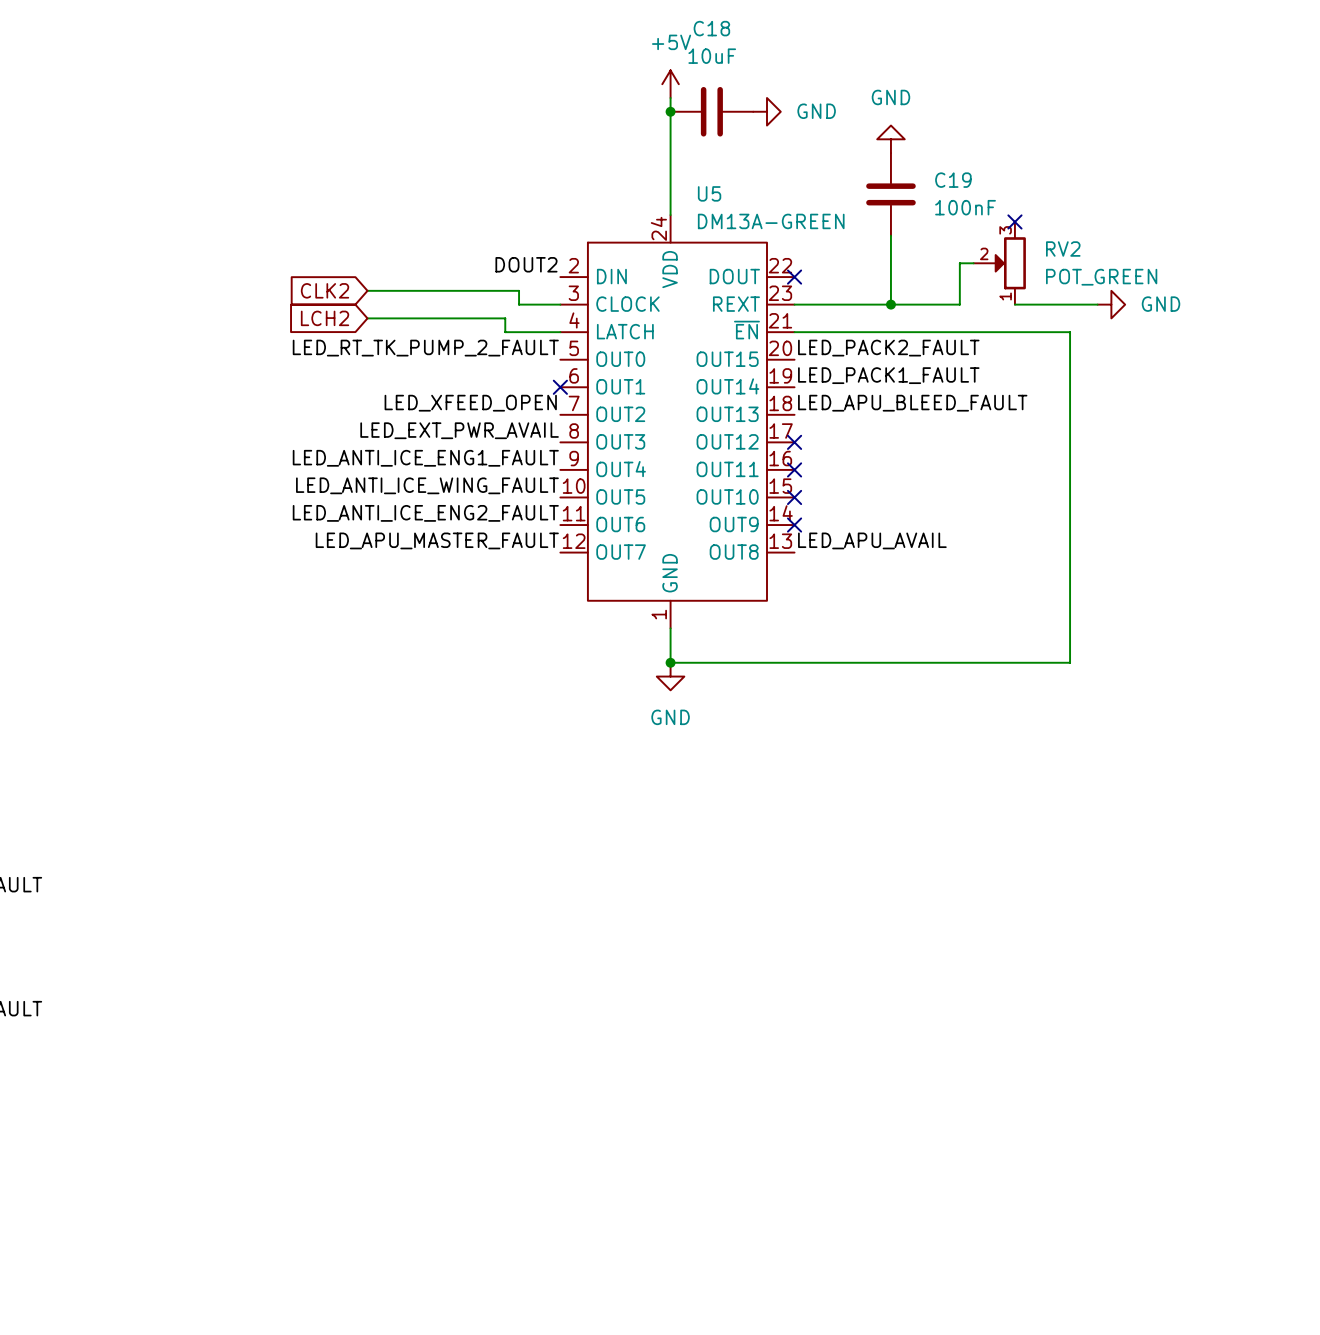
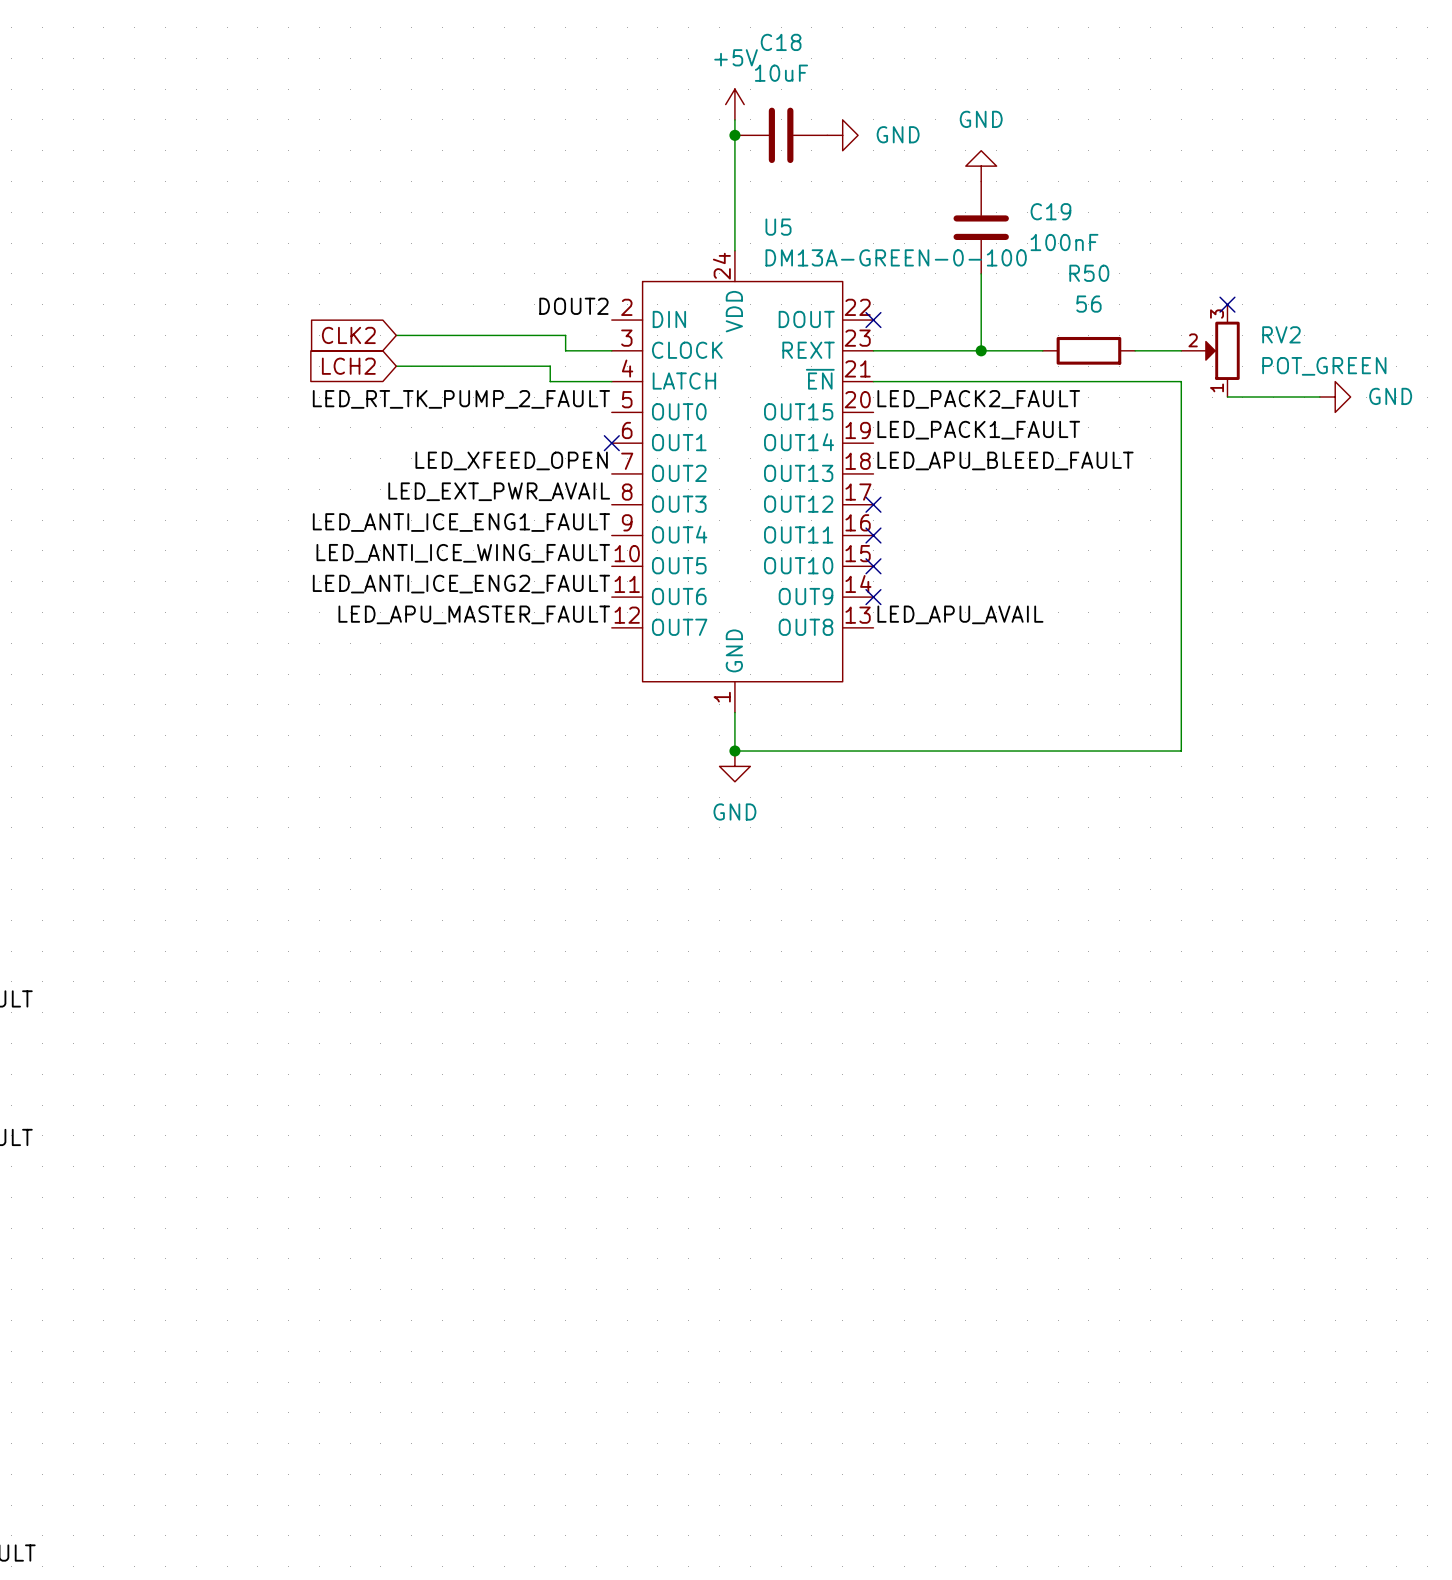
U5 value: DM13A-GREEN (771, 221) -> DM13A-GREEN-0-100 (896, 257)
no-connect mark: (1014, 221) -> none
wire: (973, 263) (959, 263) (959, 304) (946, 304) -> none
RV2 position: (999, 263) -> (1210, 350)
no-connect mark: none -> (1227, 304)
R50: none -> 56 (1088, 350)
power symbol position: GND (1111, 304) -> GND (1335, 397)
wire: none -> (1227, 397) (1319, 397)

